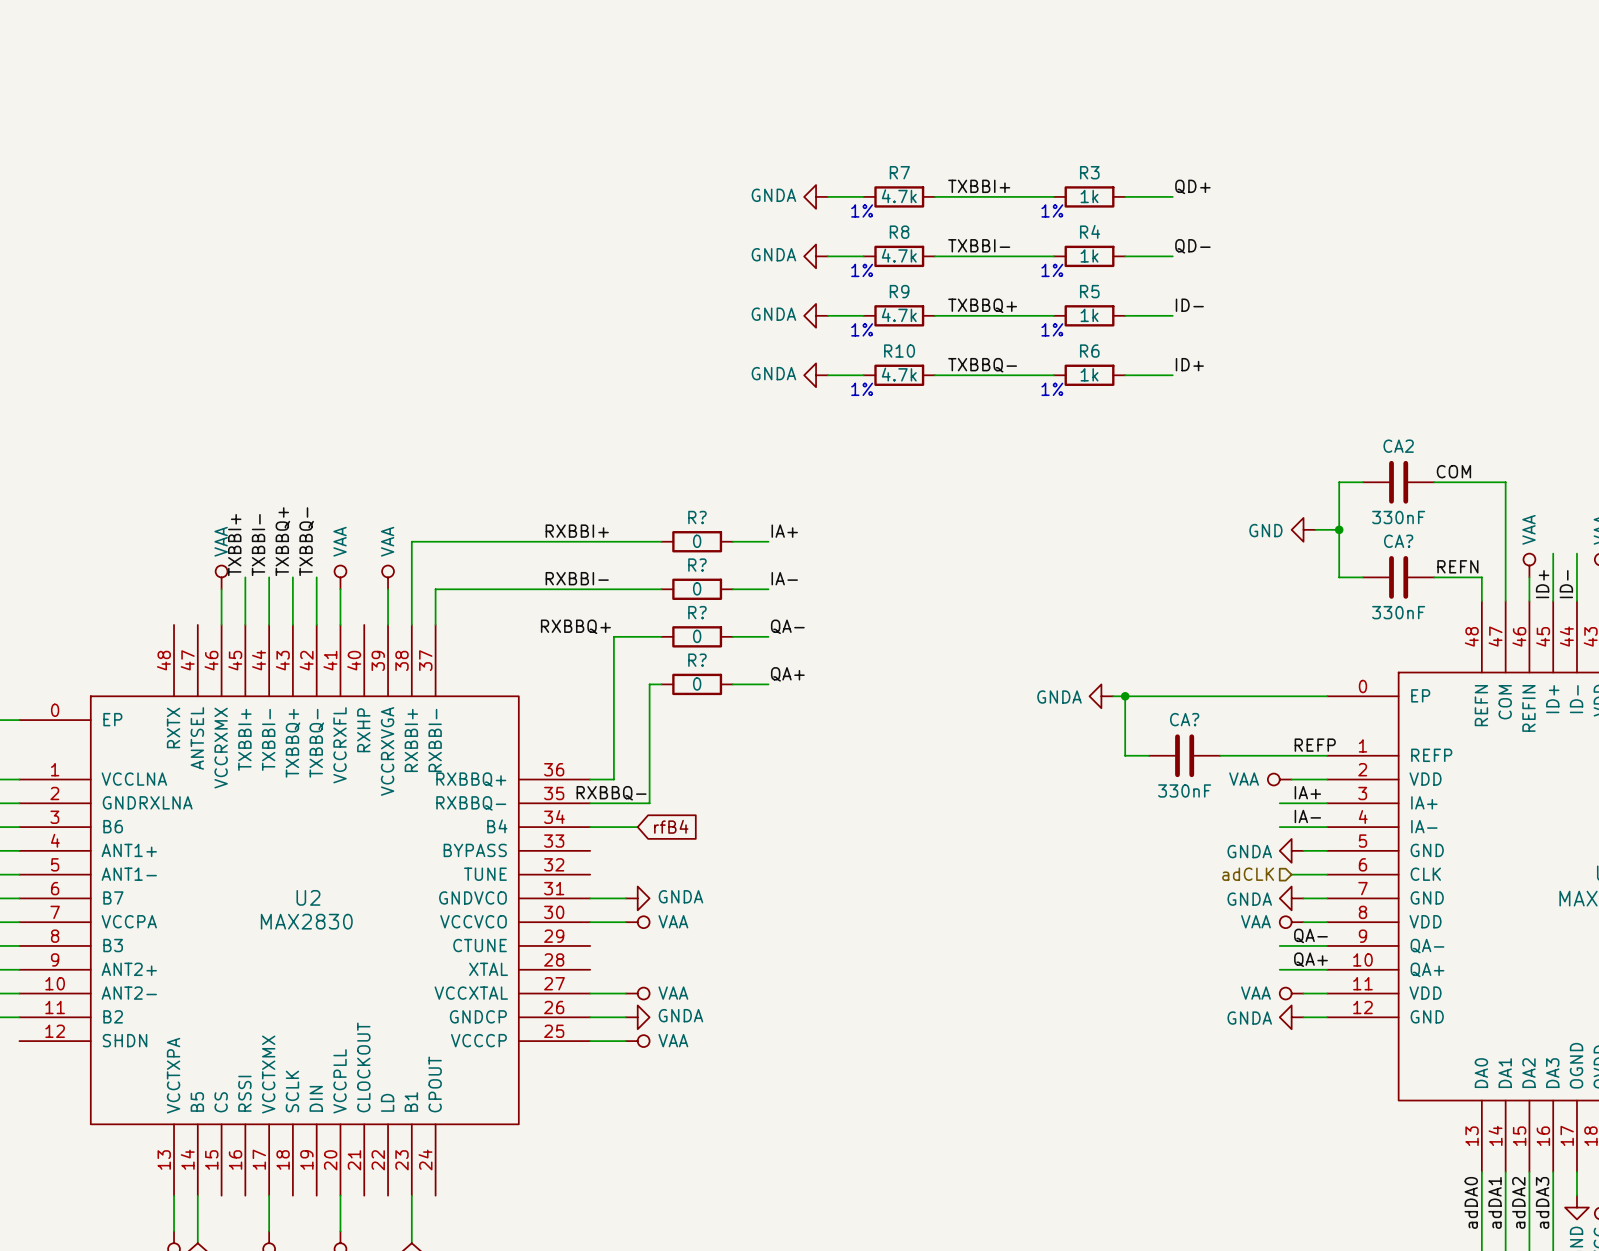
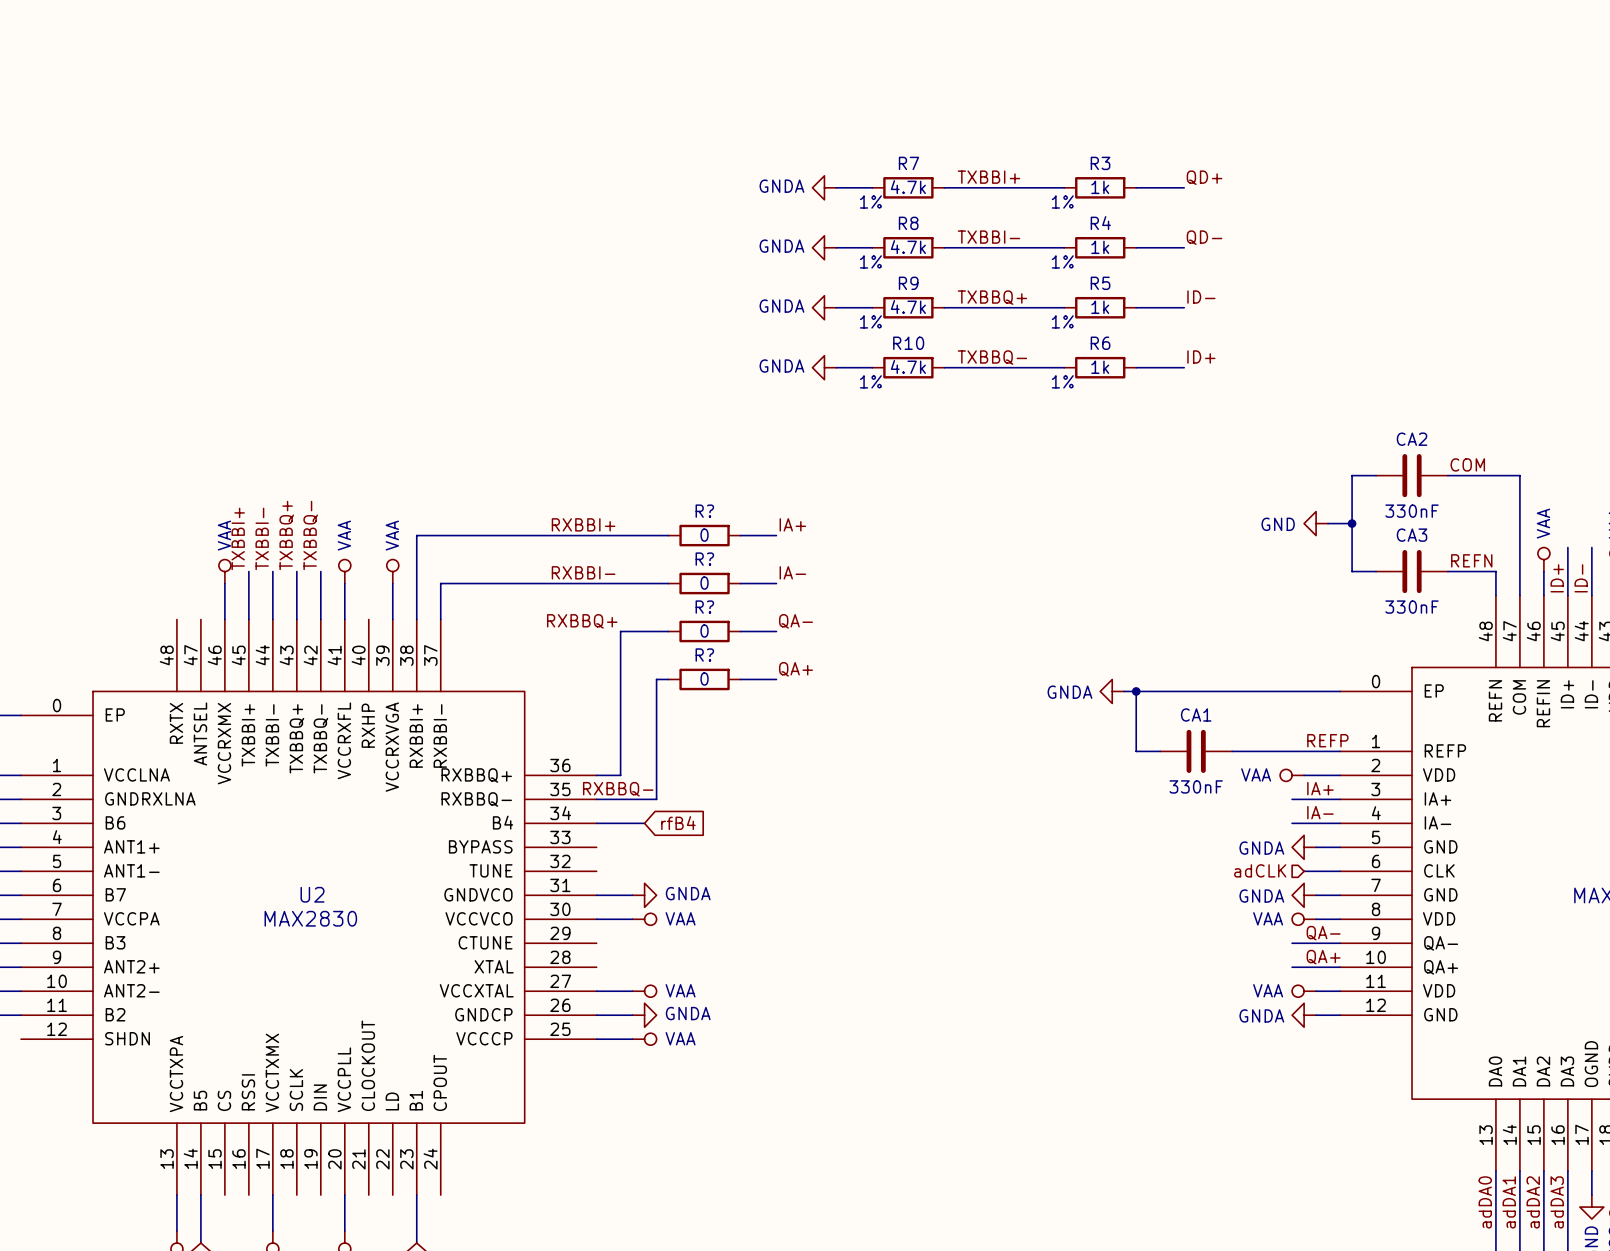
CA? name: CA? (1398, 541) -> CA3 (1412, 535)
CA? name: CA? (1184, 719) -> CA1 (1196, 714)

